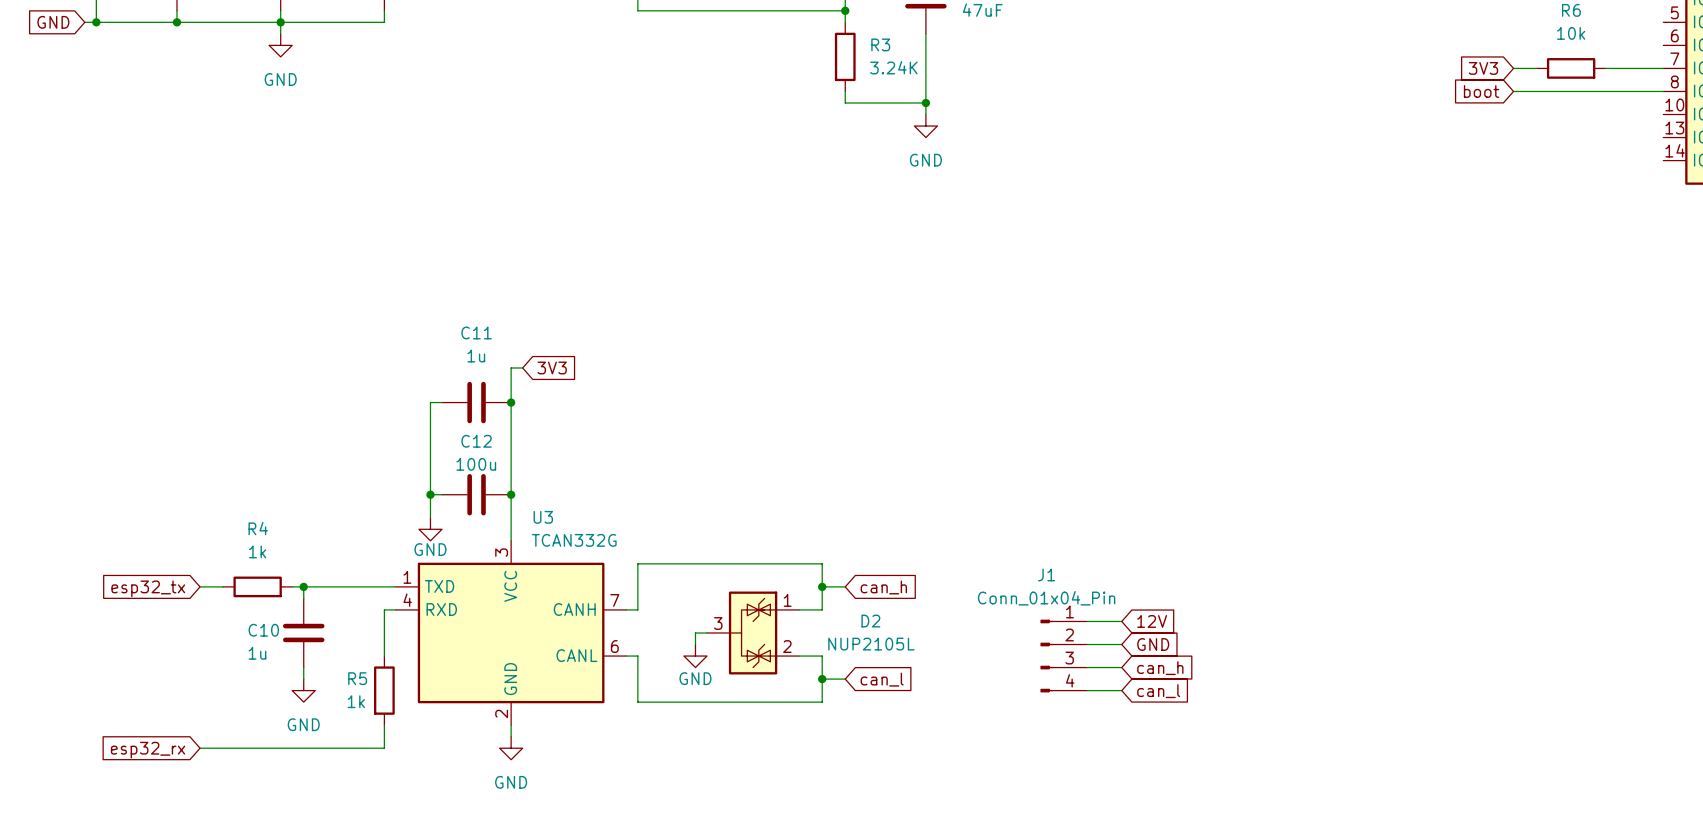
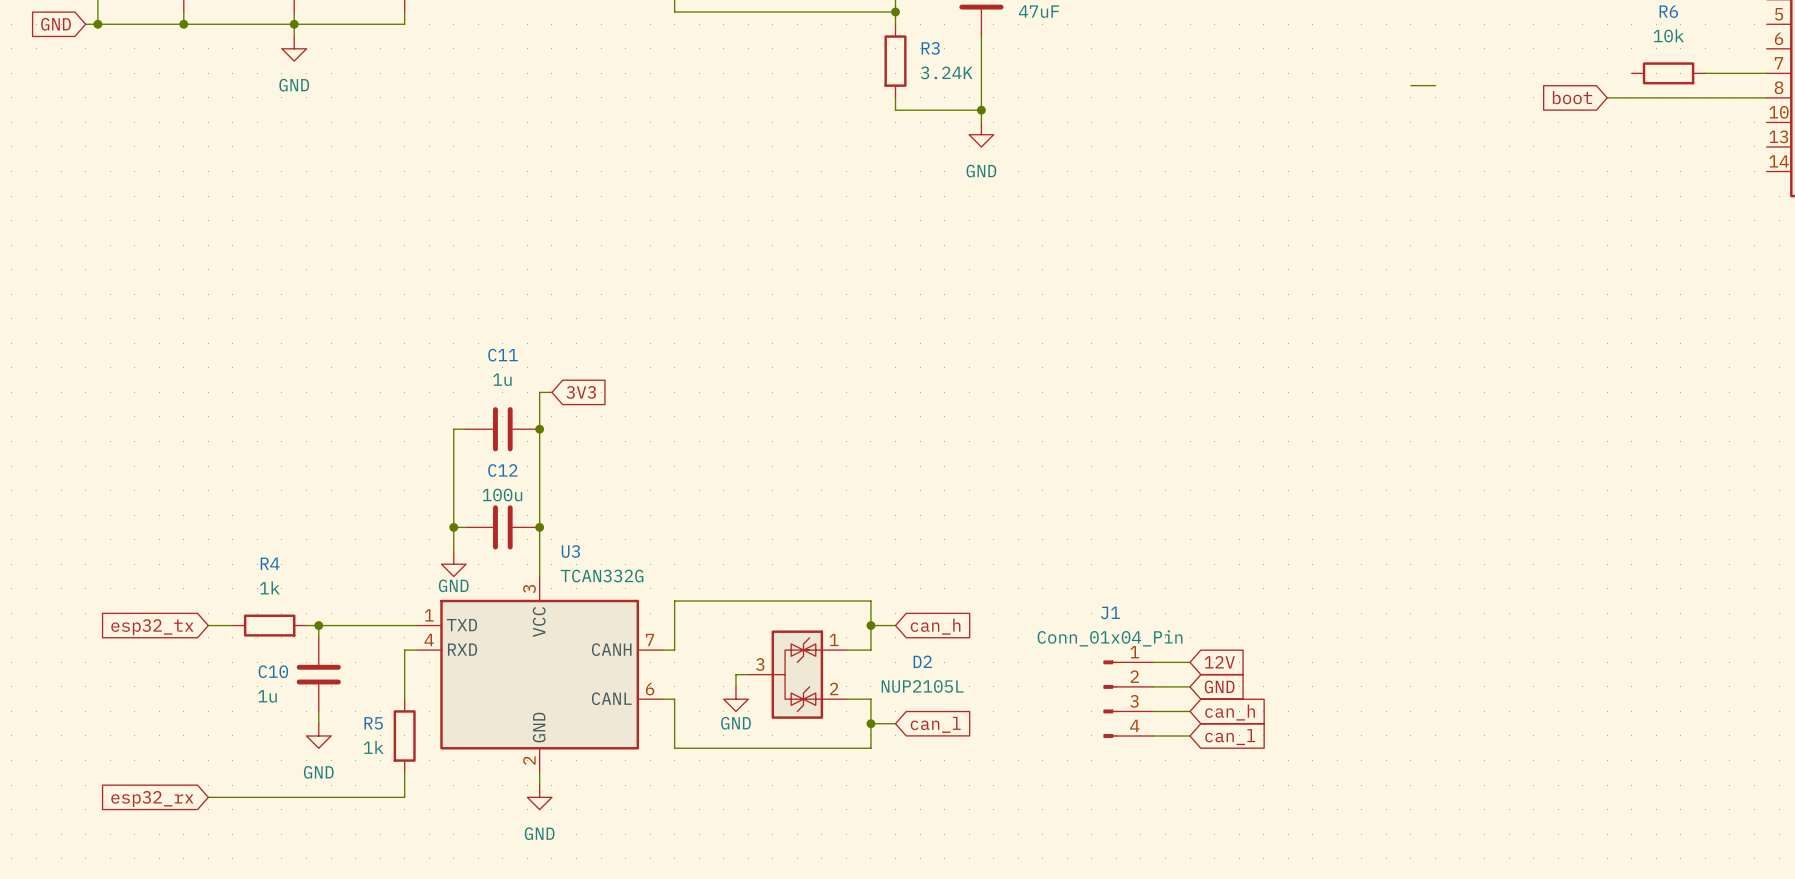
global label: 3V3 (1483, 68) -> none
wire: (1513, 68) (1536, 68) -> (1410, 85) (1435, 85)

